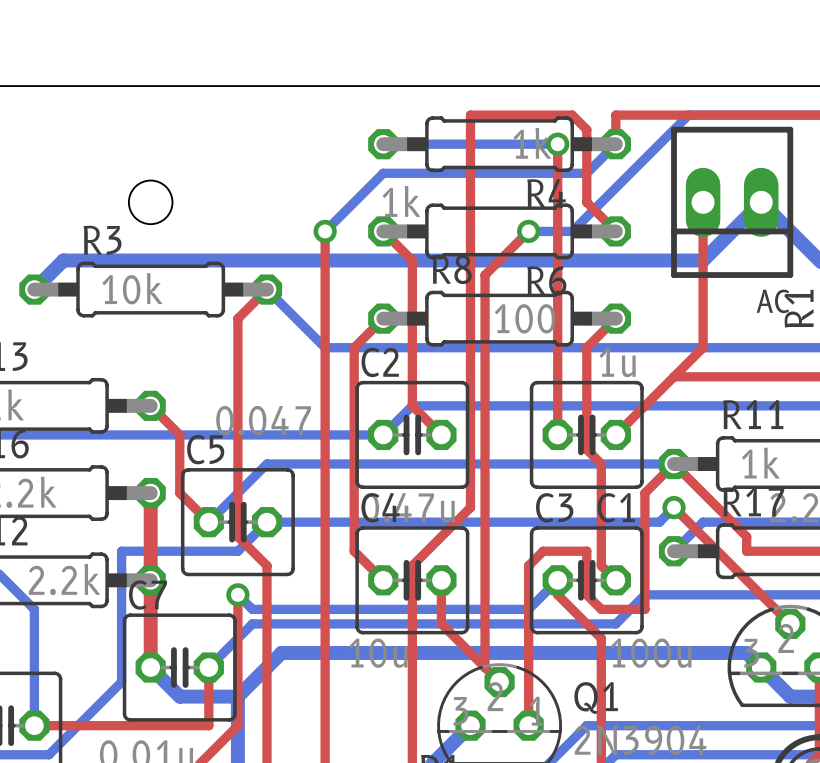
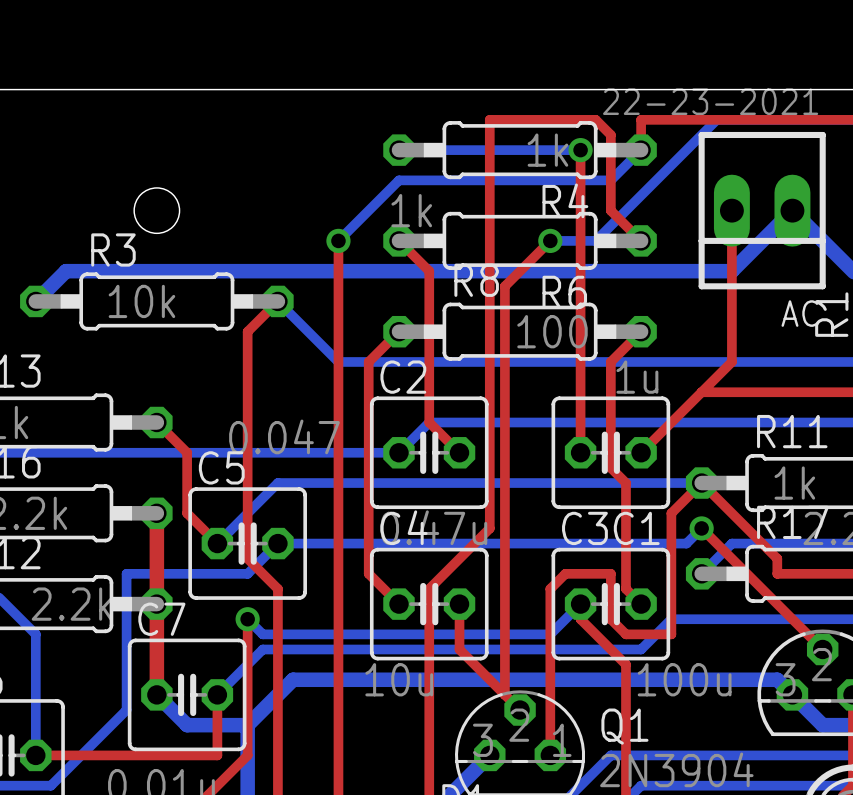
AC value: none -> 22-23-2021 (710, 101)

